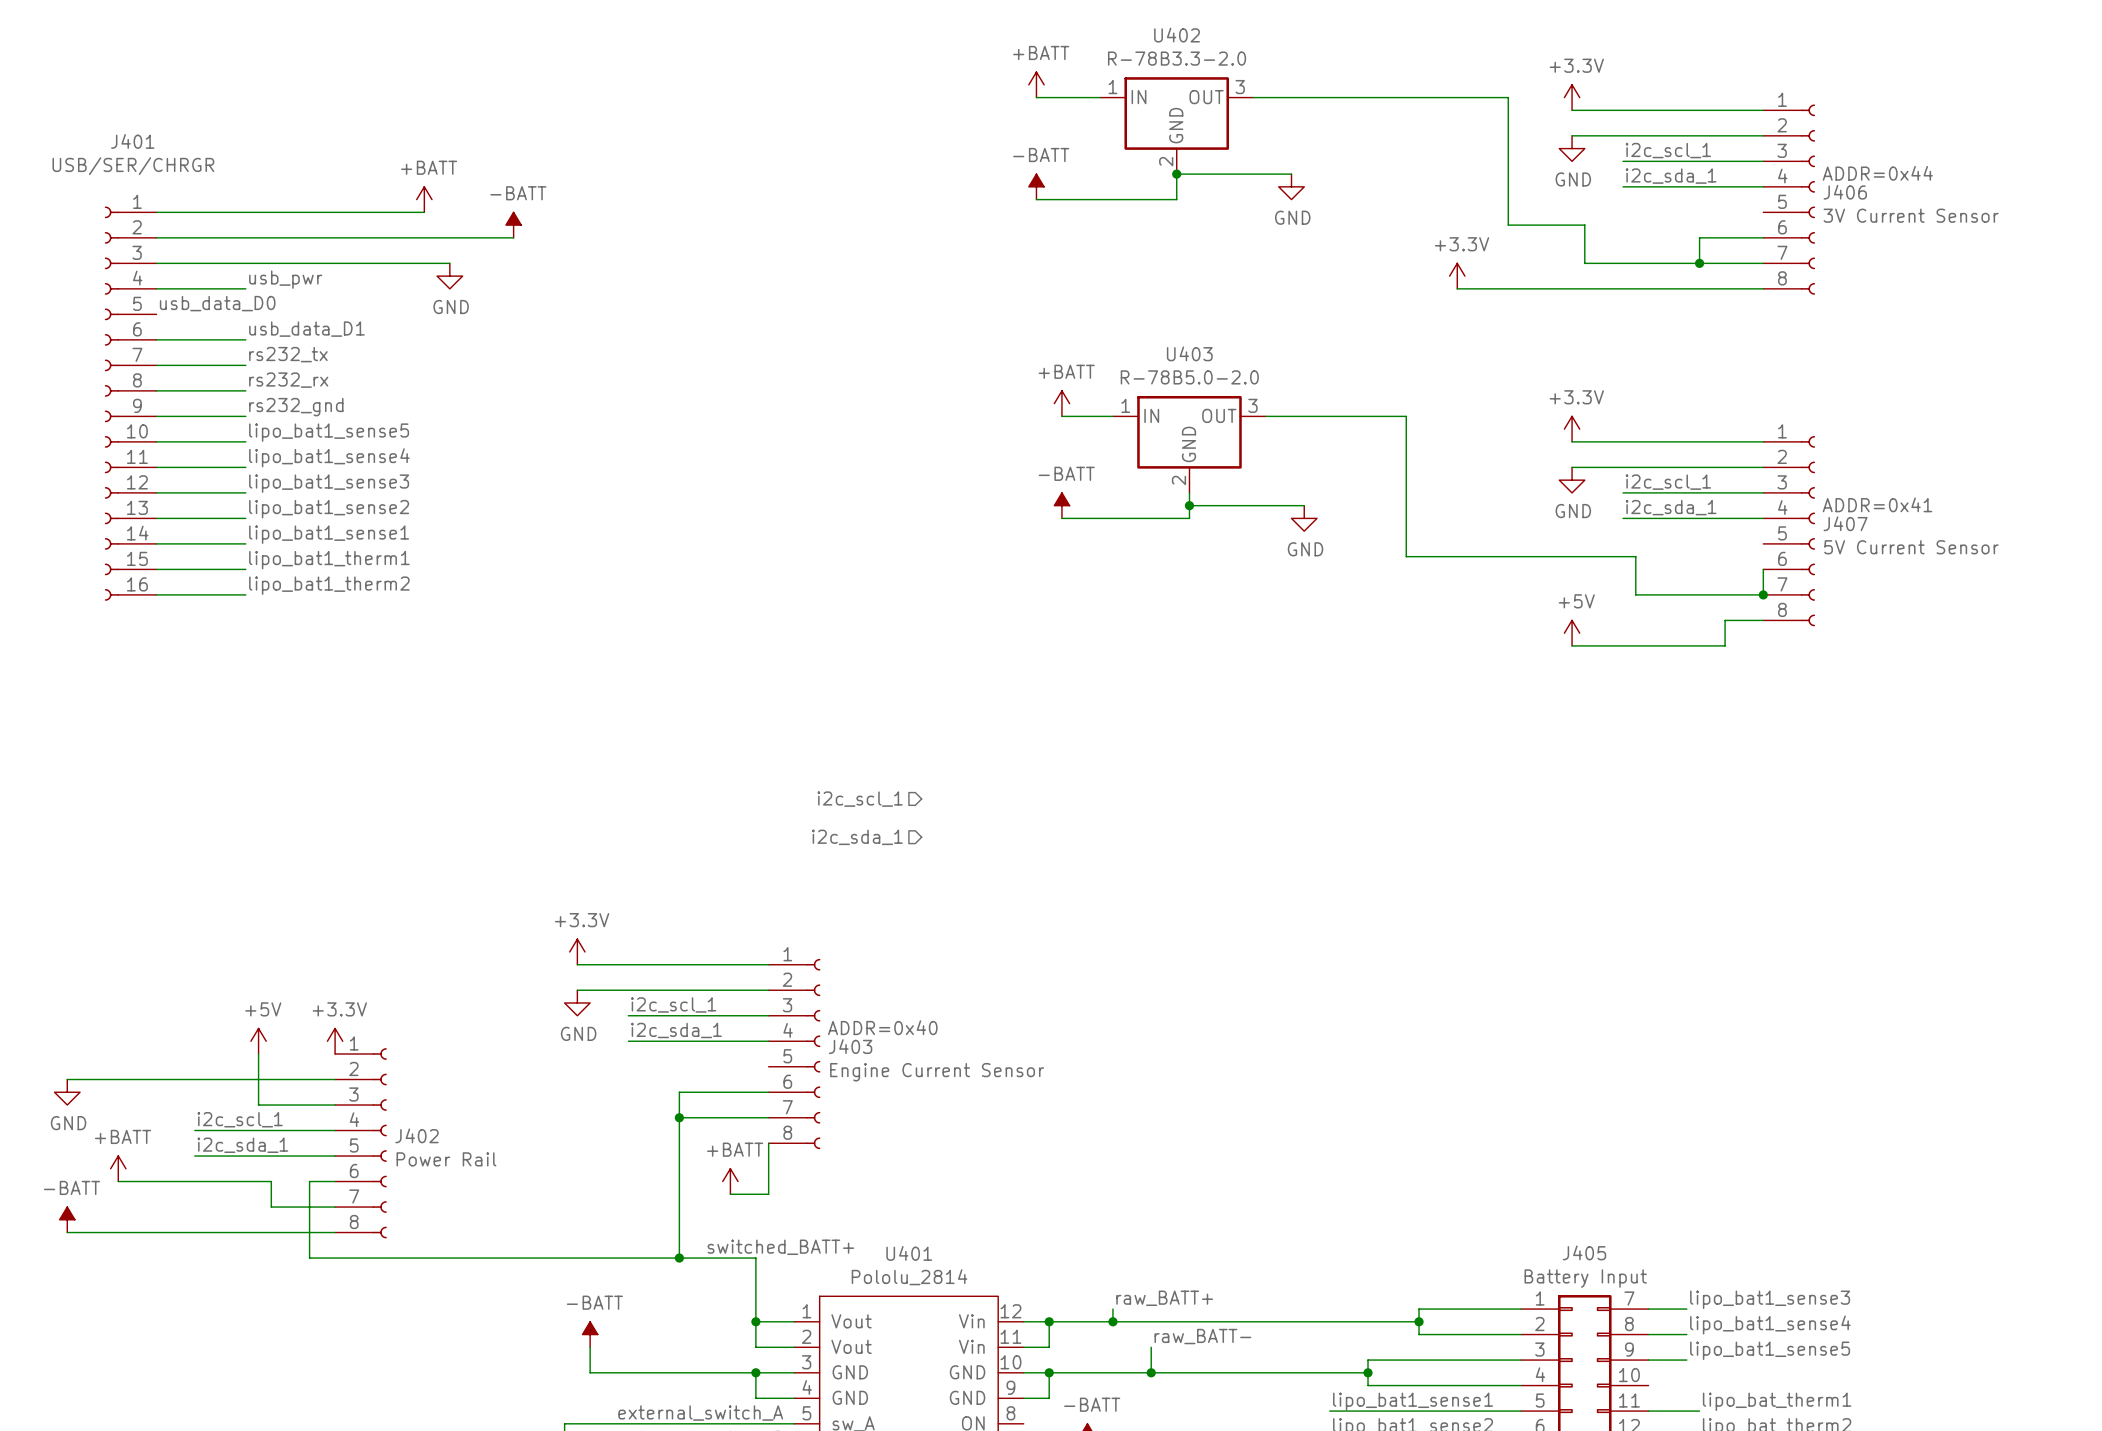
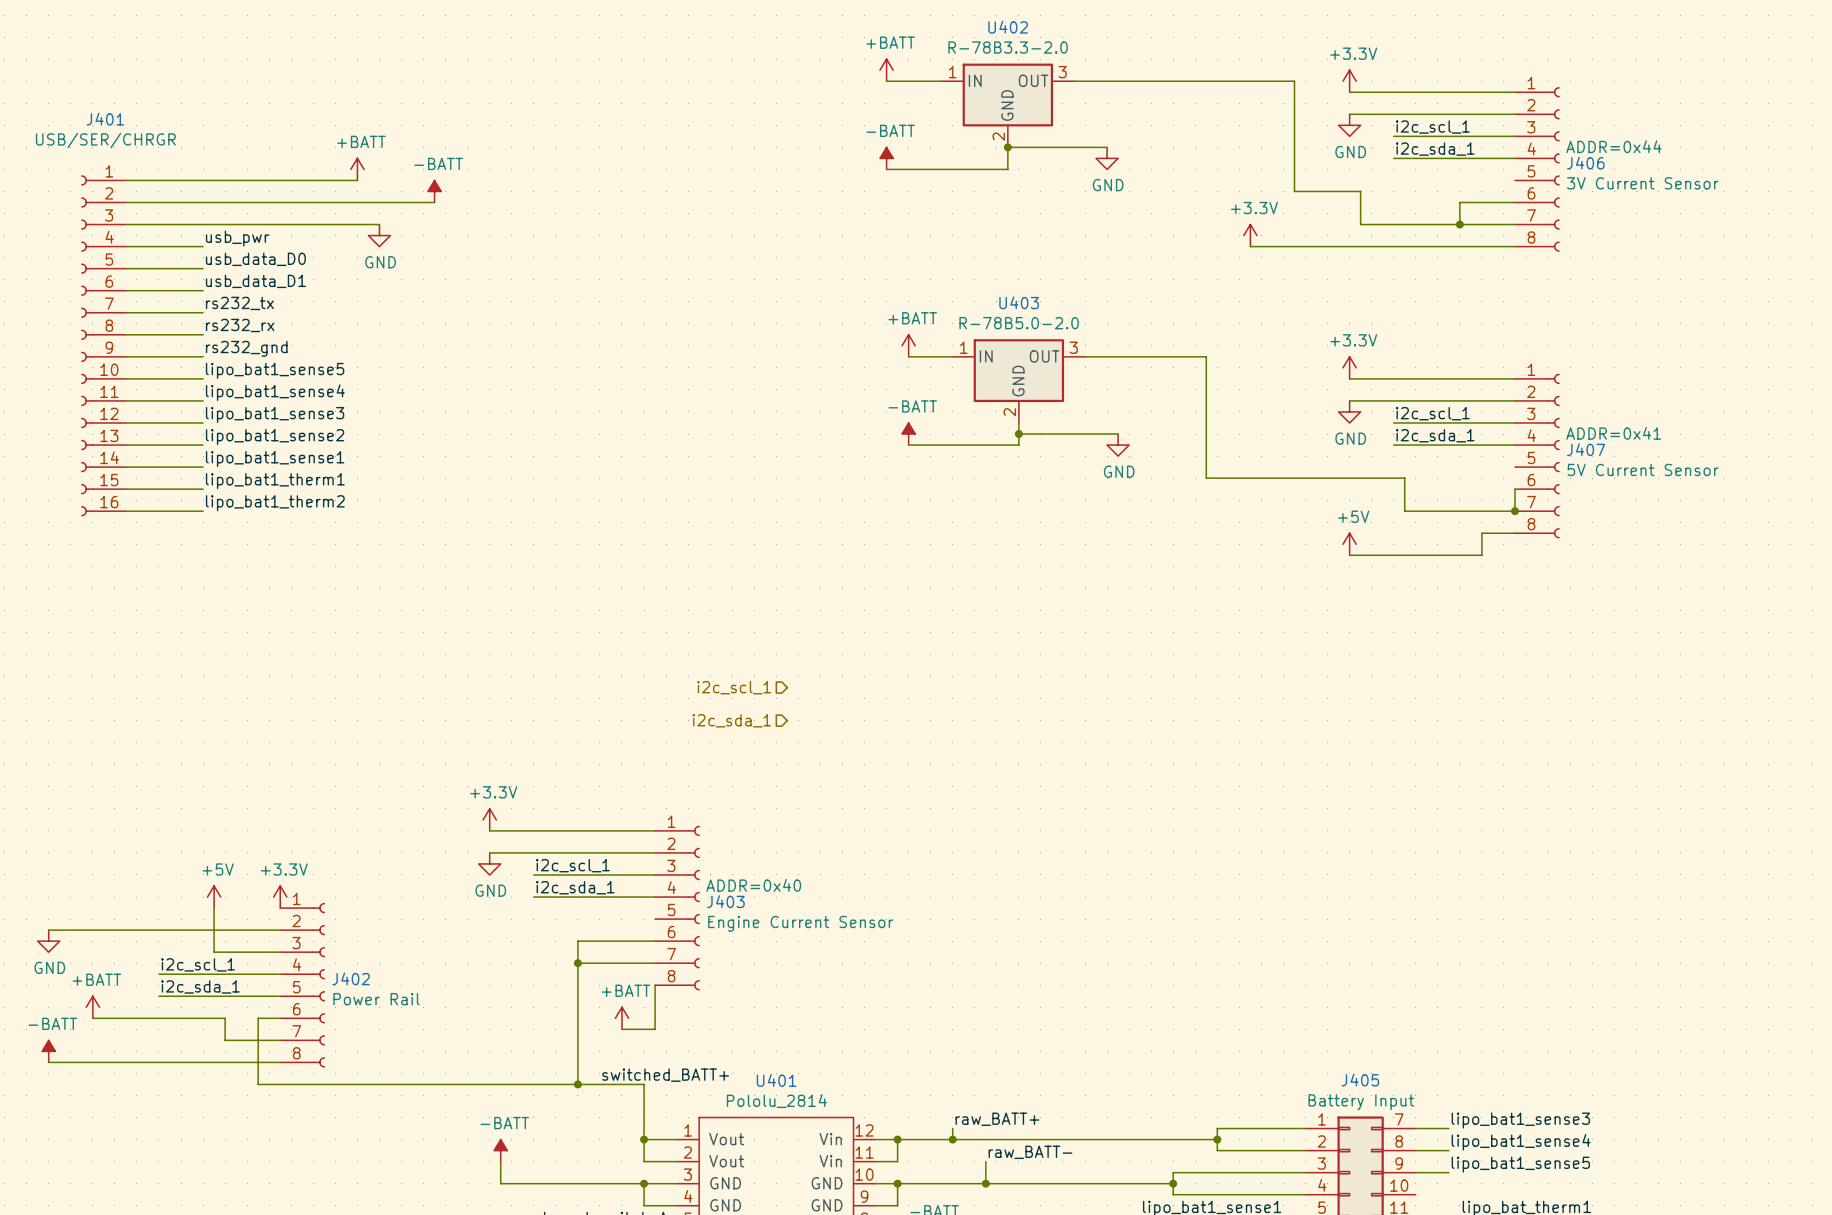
label position: usb_data_D0 (217, 303) -> usb_data_D0 (255, 259)
wire: none -> (125, 268) (203, 268)

